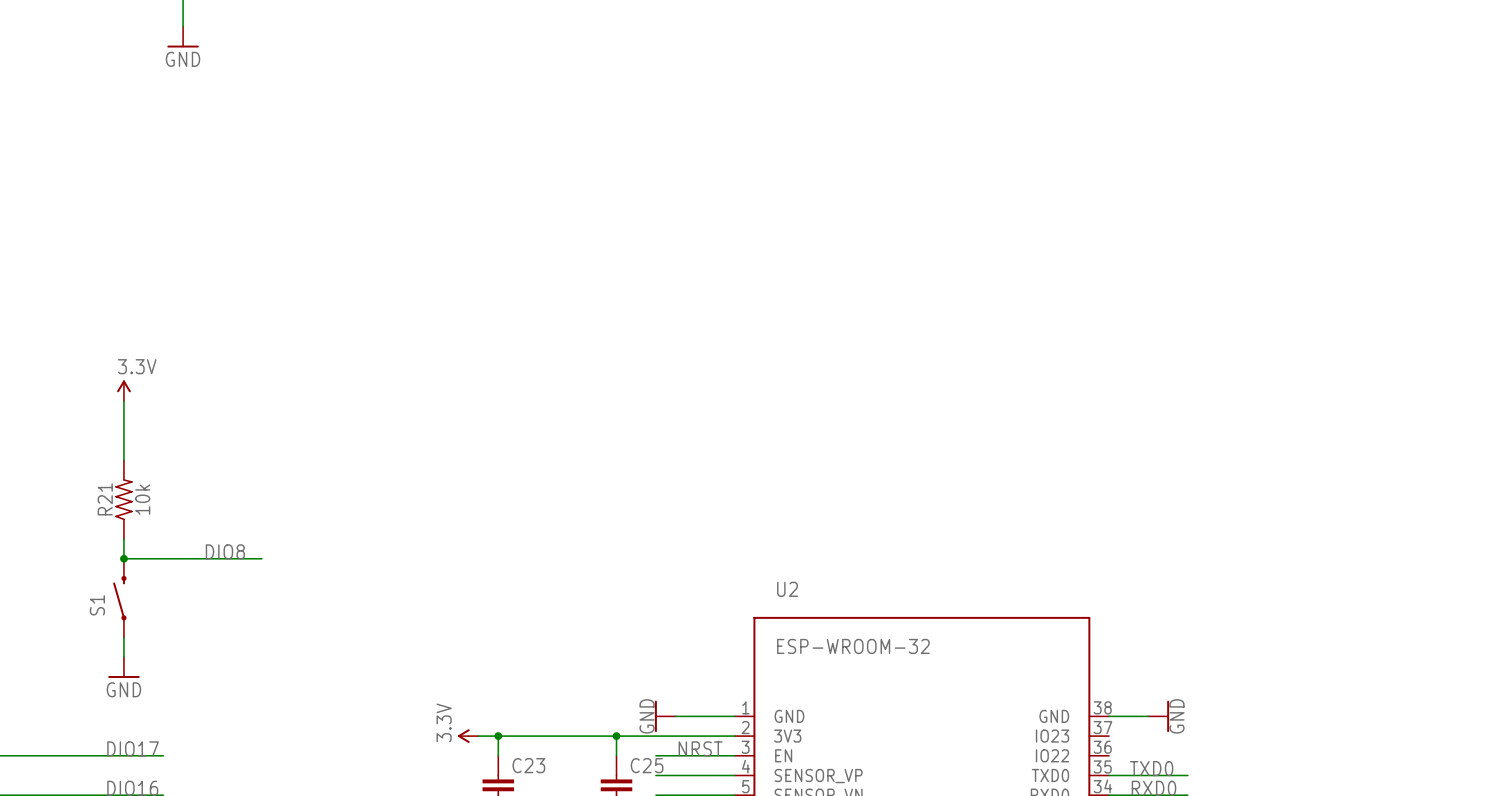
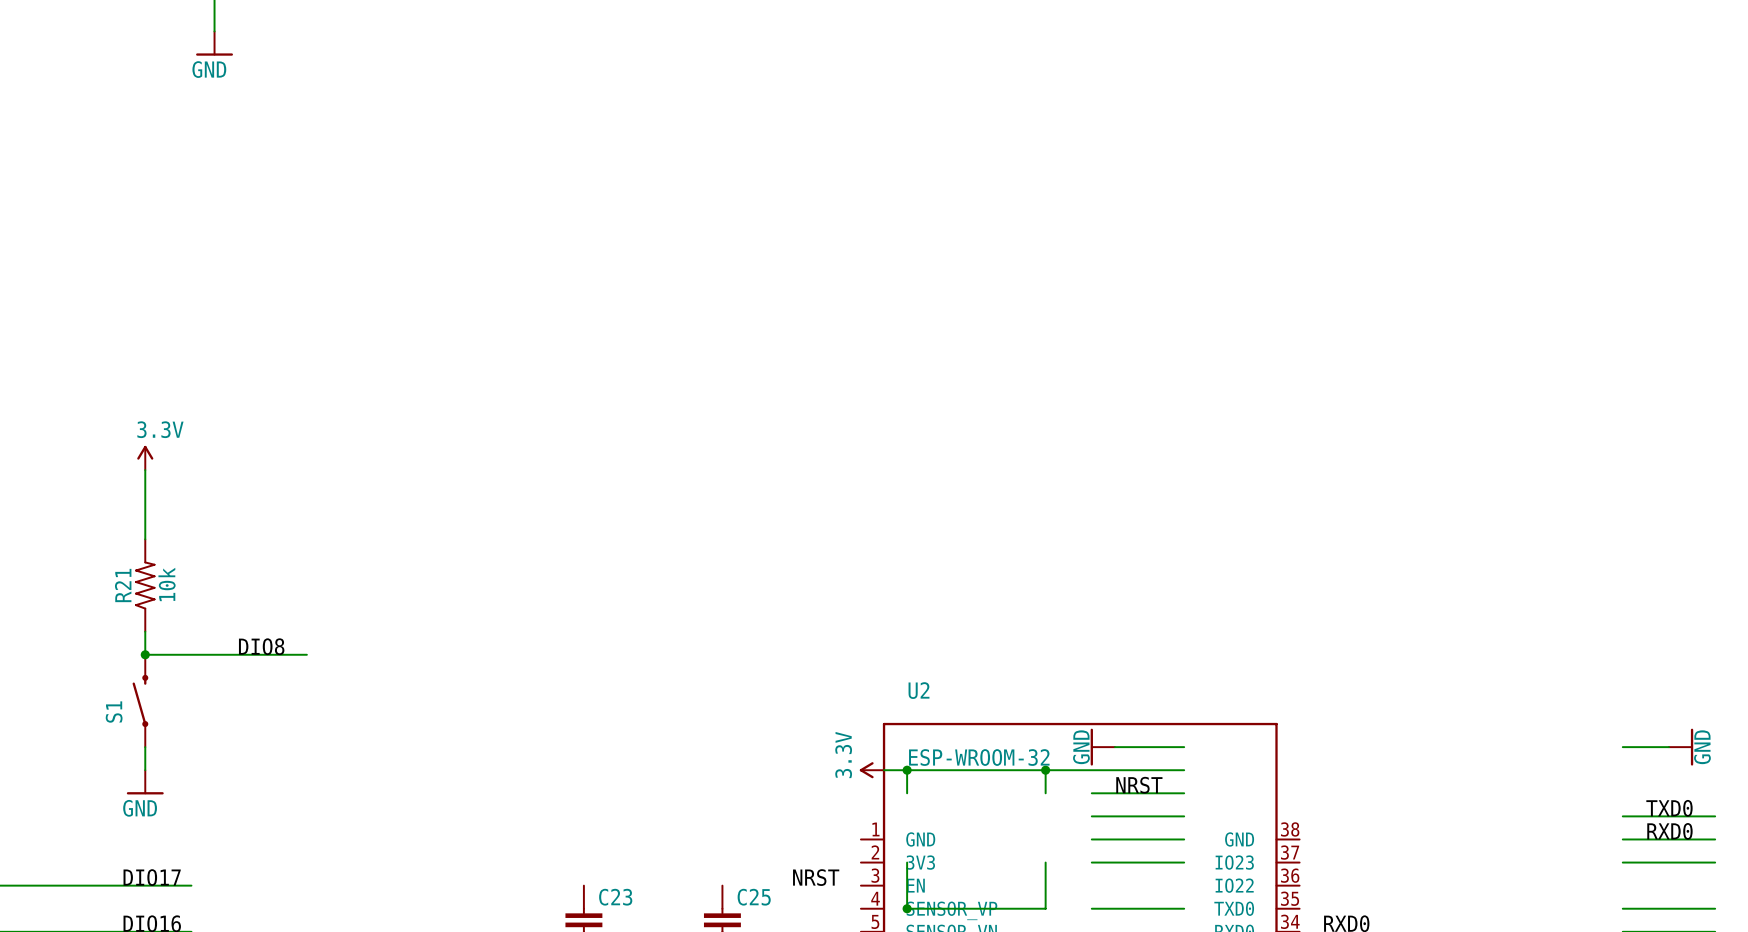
power symbol: none -> GND (1102, 747)
wire: none -> (1114, 747) (1184, 747)
wire: none -> (1622, 747) (1668, 747)
power symbol: none -> GND (1681, 747)
power symbol: none -> 3.3V (871, 770)
wire: none -> (884, 770) (1184, 770)
junction: none -> (907, 770)
wire: none -> (1045, 770) (1045, 793)
junction: none -> (1045, 770)
label: none -> NRST (1139, 785)
wire: none -> (1091, 793) (1184, 793)
label: none -> TXD0 (1669, 808)
wire: none -> (1091, 816) (1184, 816)
wire: none -> (1622, 816) (1715, 816)
label: none -> RXD0 (1669, 831)
power symbol: GND (665, 716) -> none
wire: (675, 716) (734, 716) -> none
wire: (1109, 716) (1148, 716) -> none
power symbol: GND (1158, 716) -> none
wire: none -> (1622, 839) (1715, 839)
power symbol: 3.3V (468, 736) -> none
wire: (478, 736) (734, 736) -> none
wire: (498, 736) (498, 755) -> none
junction: (498, 736) -> none
wire: (616, 736) (616, 755) -> (907, 770) (907, 793)
junction: (616, 736) -> none
wire: none -> (907, 862) (907, 908) (1045, 908) (1045, 862)
wire: none -> (1622, 862) (1715, 862)
wire: (655, 755) (734, 755) -> none
label: TXD0 (1151, 768) -> none
wire: (655, 775) (734, 775) -> none
junction: none -> (907, 908)
wire: none -> (1091, 908) (1184, 908)
wire: (1109, 775) (1187, 775) -> (1091, 839) (1184, 839)
wire: none -> (1622, 908) (1715, 908)
wire: (655, 795) (734, 795) -> none
wire: (1109, 795) (1187, 795) -> (1091, 862) (1184, 862)
wire: none -> (1622, 931) (1715, 931)

